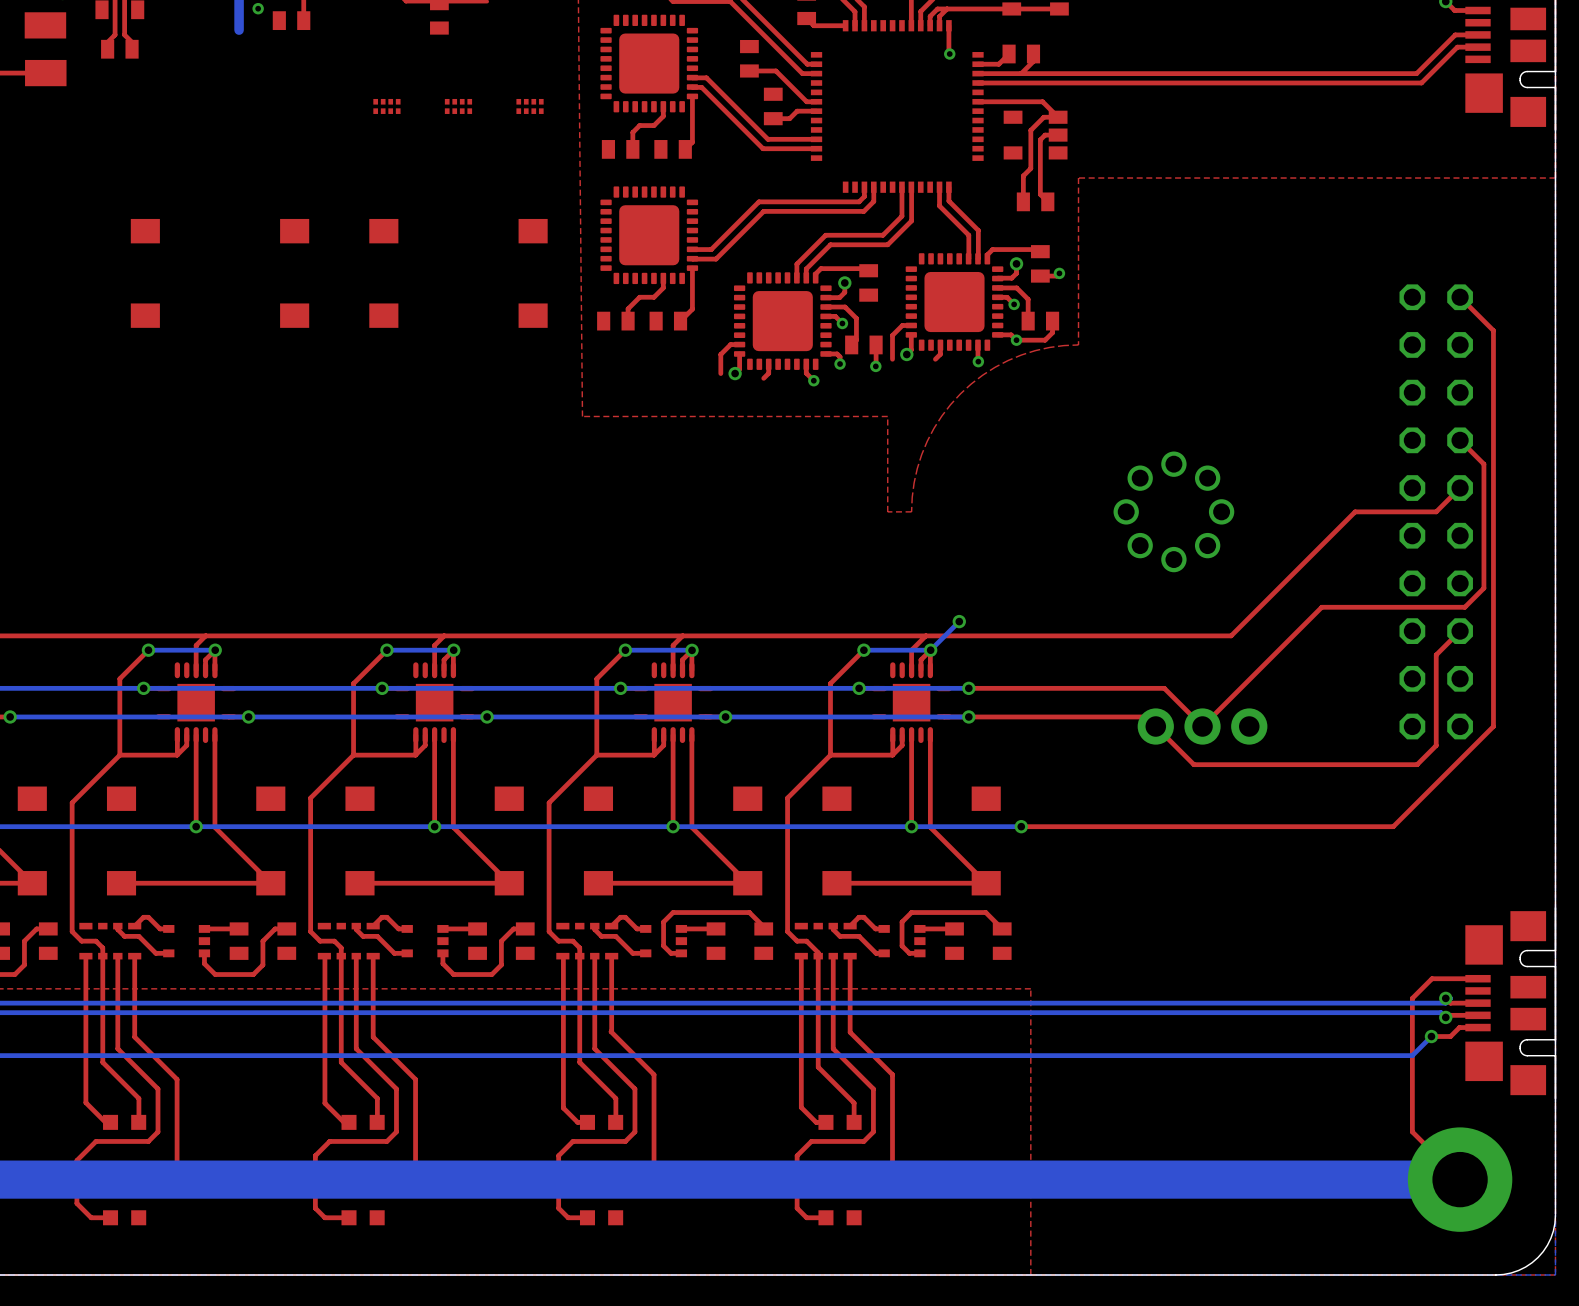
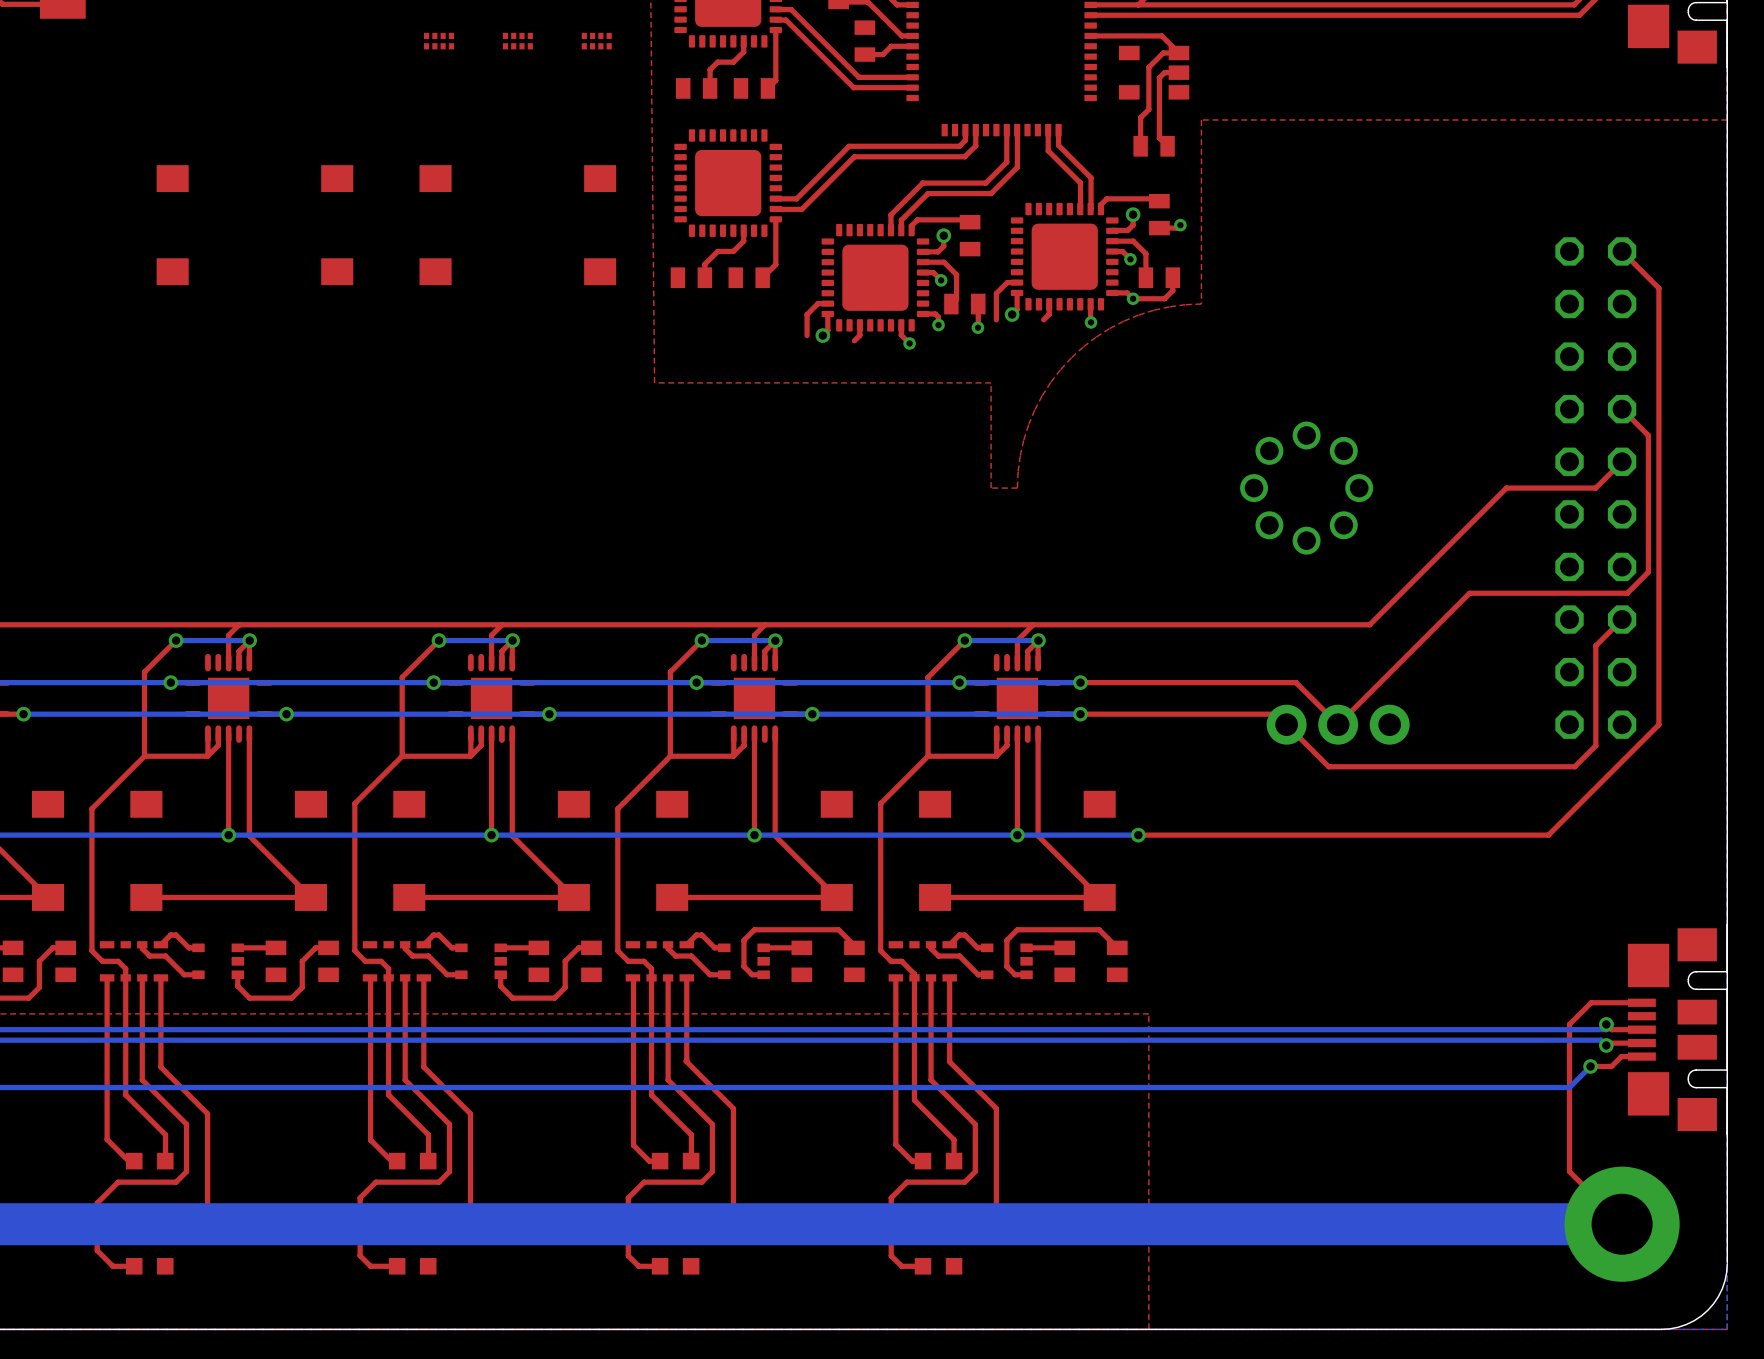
bottom track: (959, 621) (930, 650) -> none
via: (959, 621) -> none

